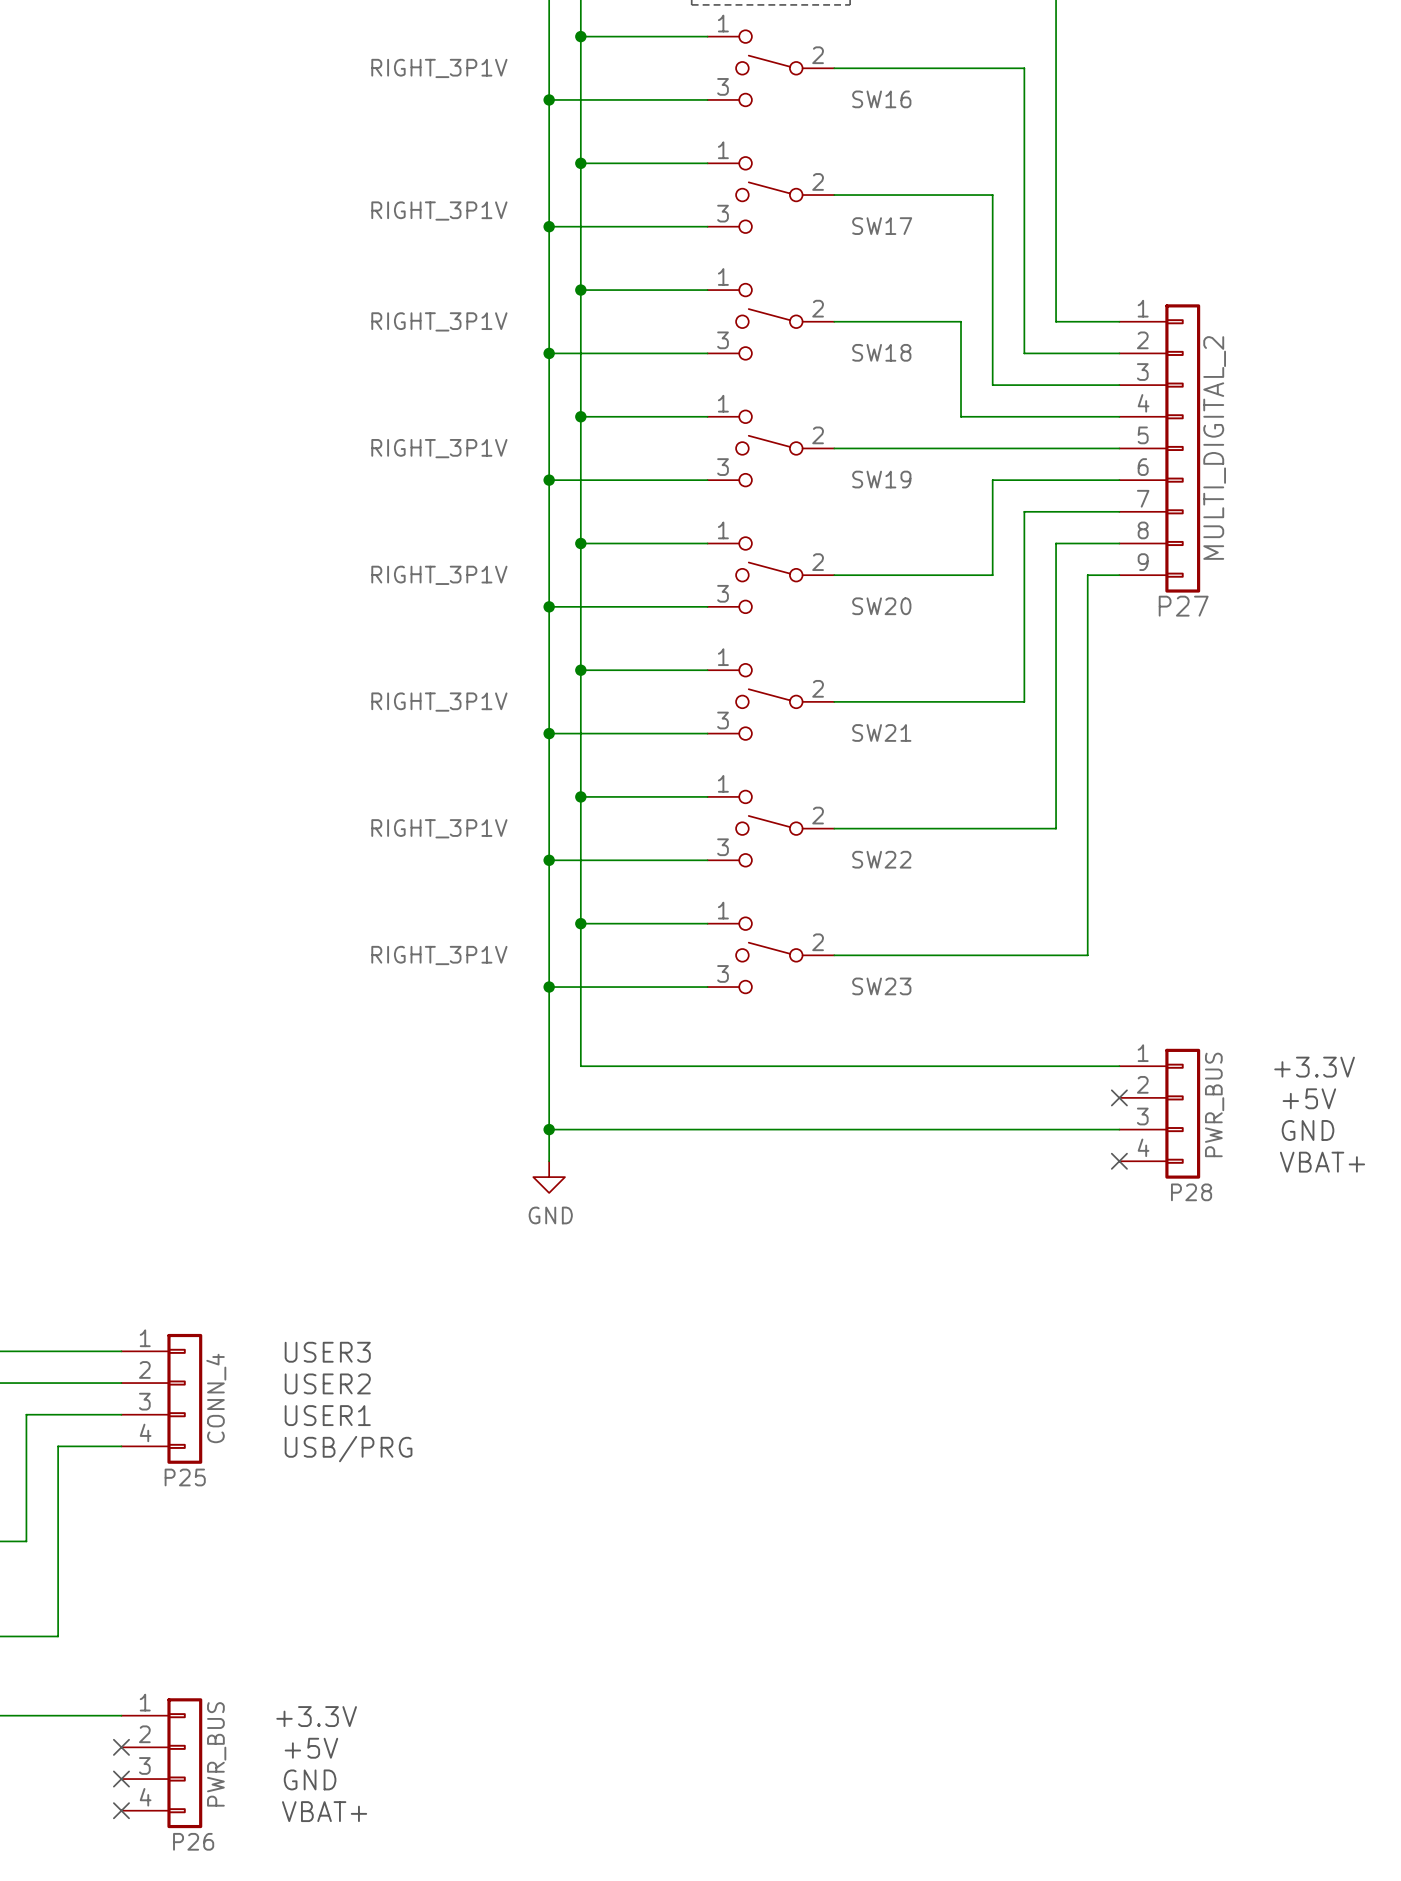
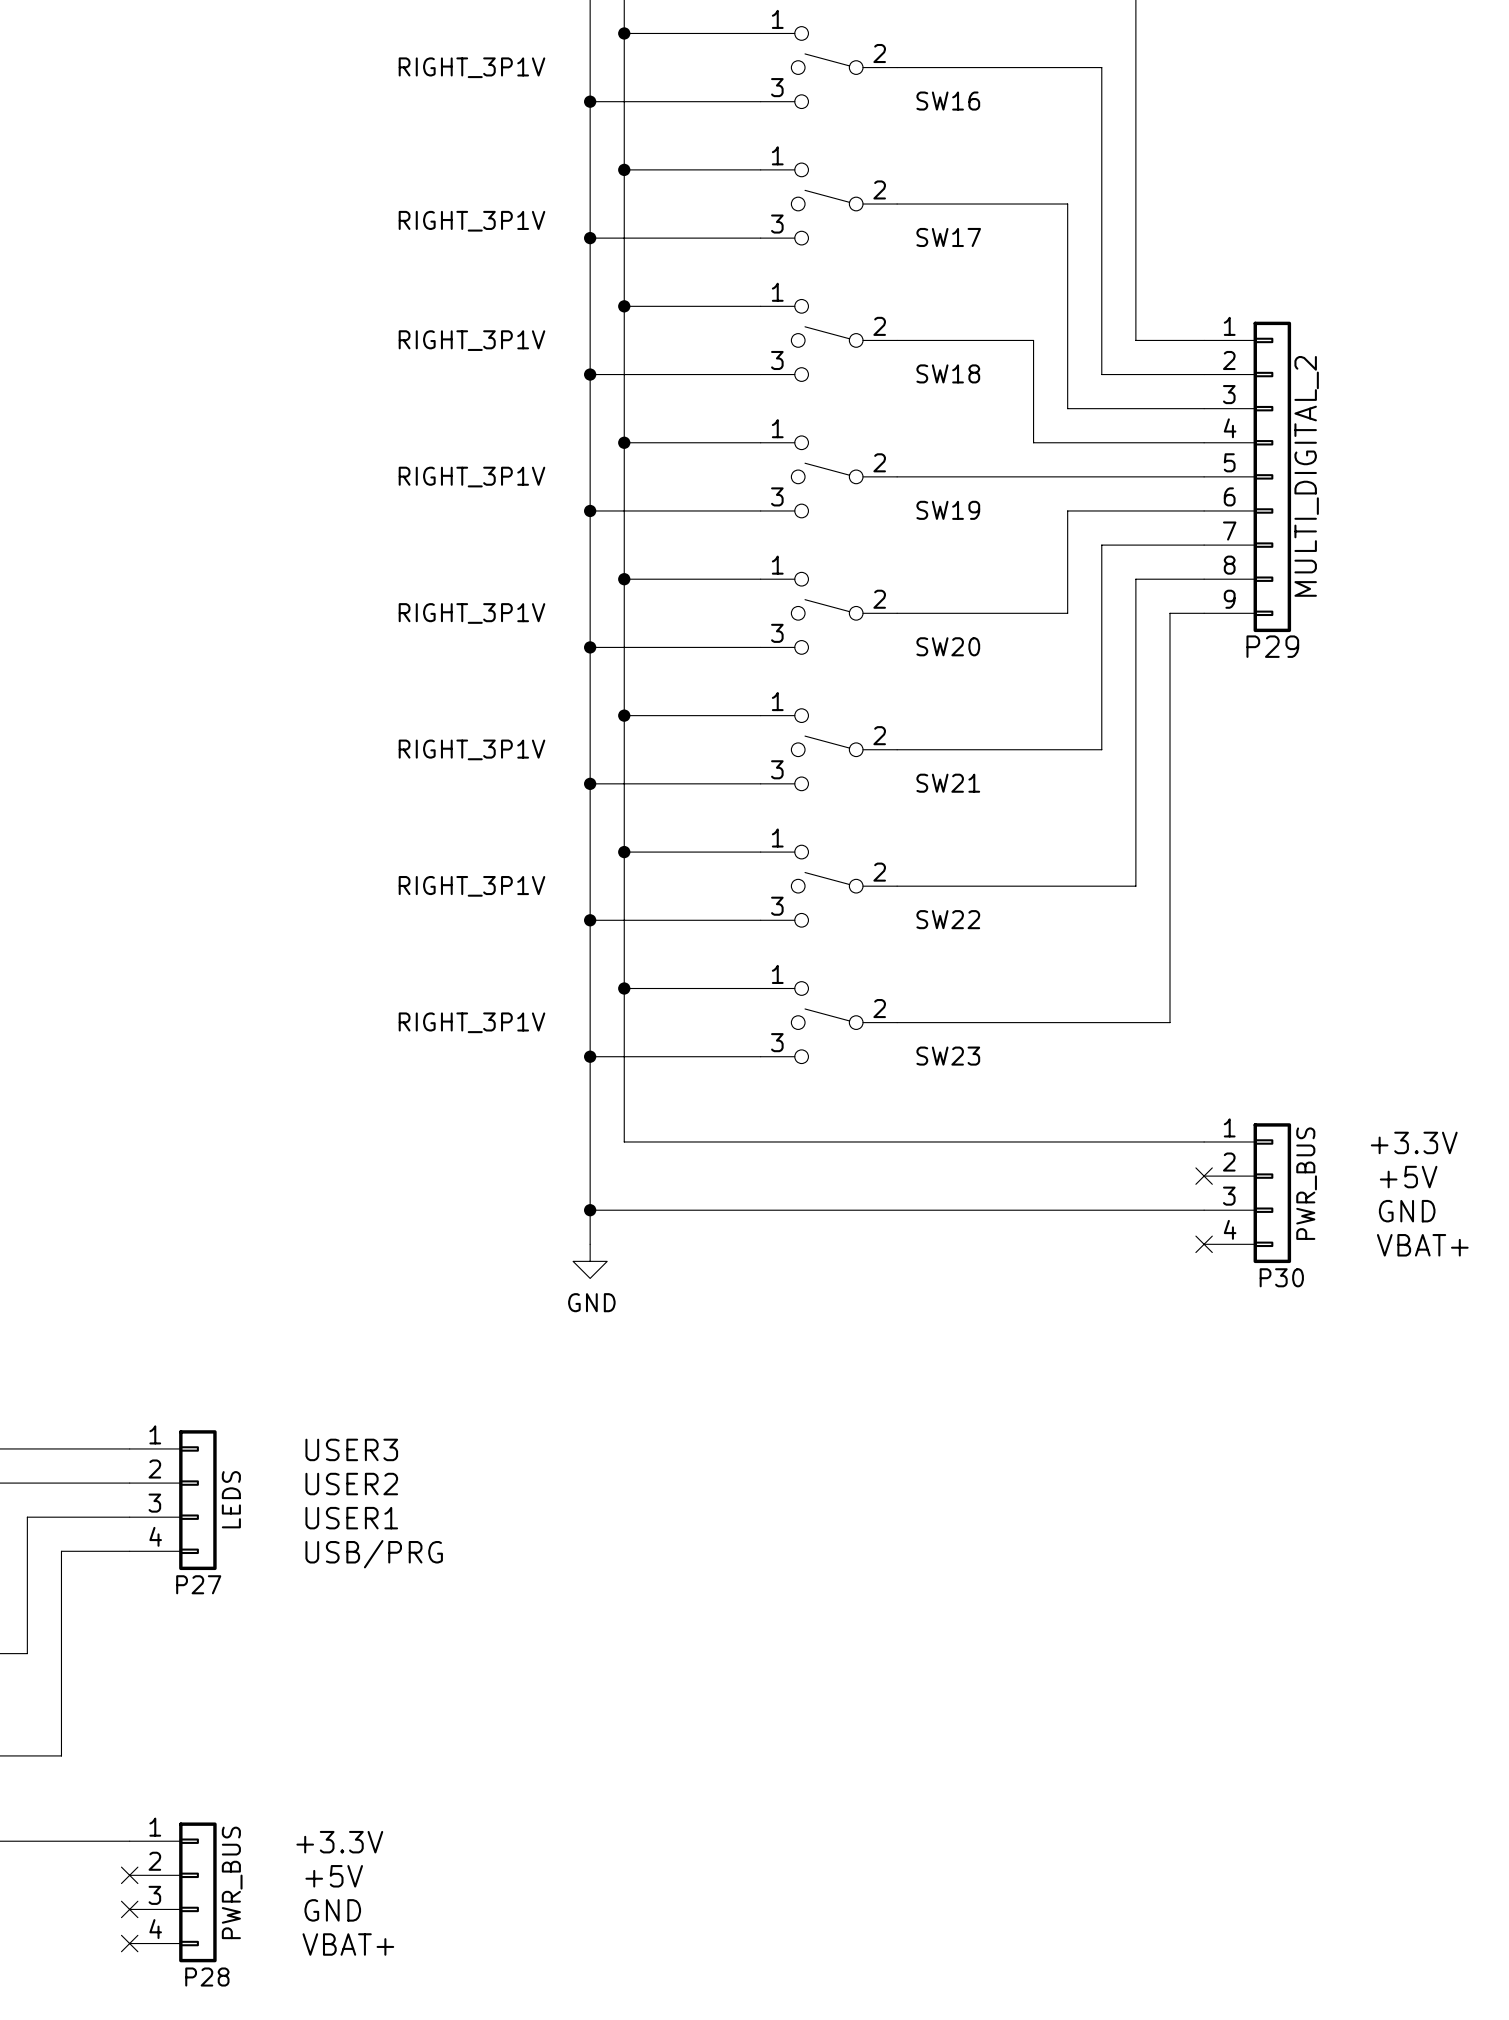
P27 name: P27 (1183, 606) -> P29 (1272, 646)
P28 name: P28 (1191, 1192) -> P30 (1281, 1277)
P25 value: CONN_4 (216, 1398) -> LEDS (231, 1499)
P25 name: P25 (185, 1477) -> P27 (198, 1584)
P26 name: P26 (193, 1841) -> P28 (207, 1977)

